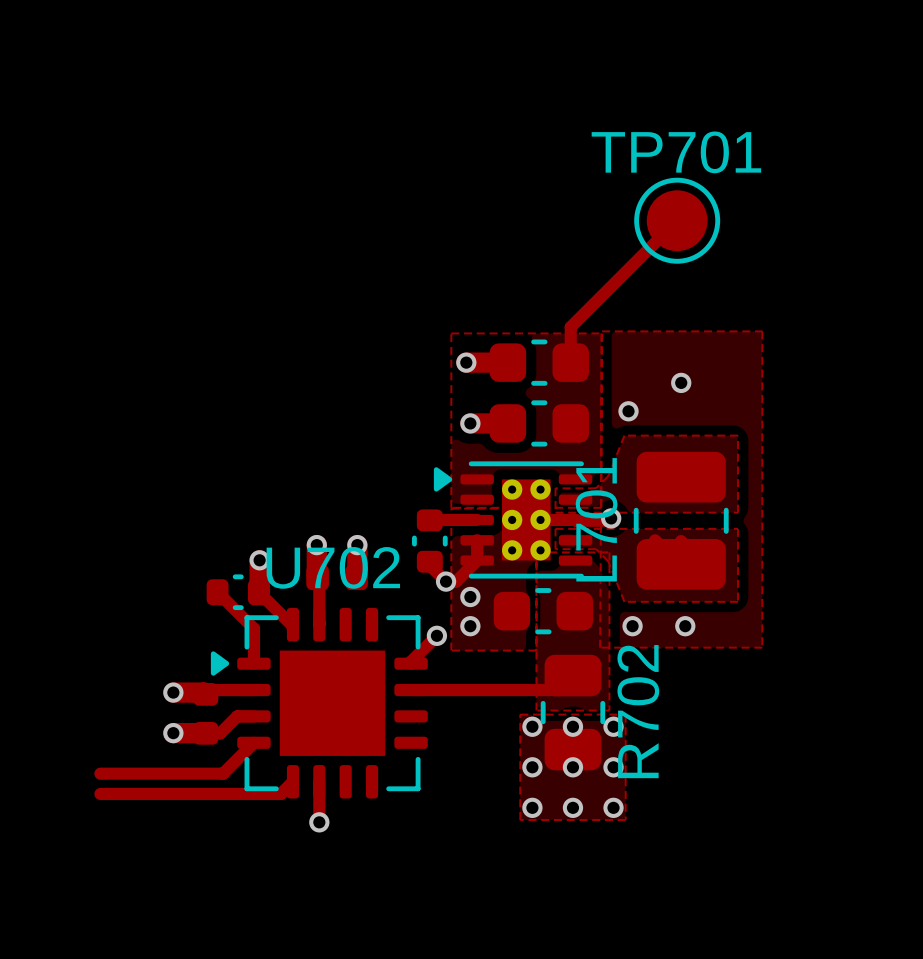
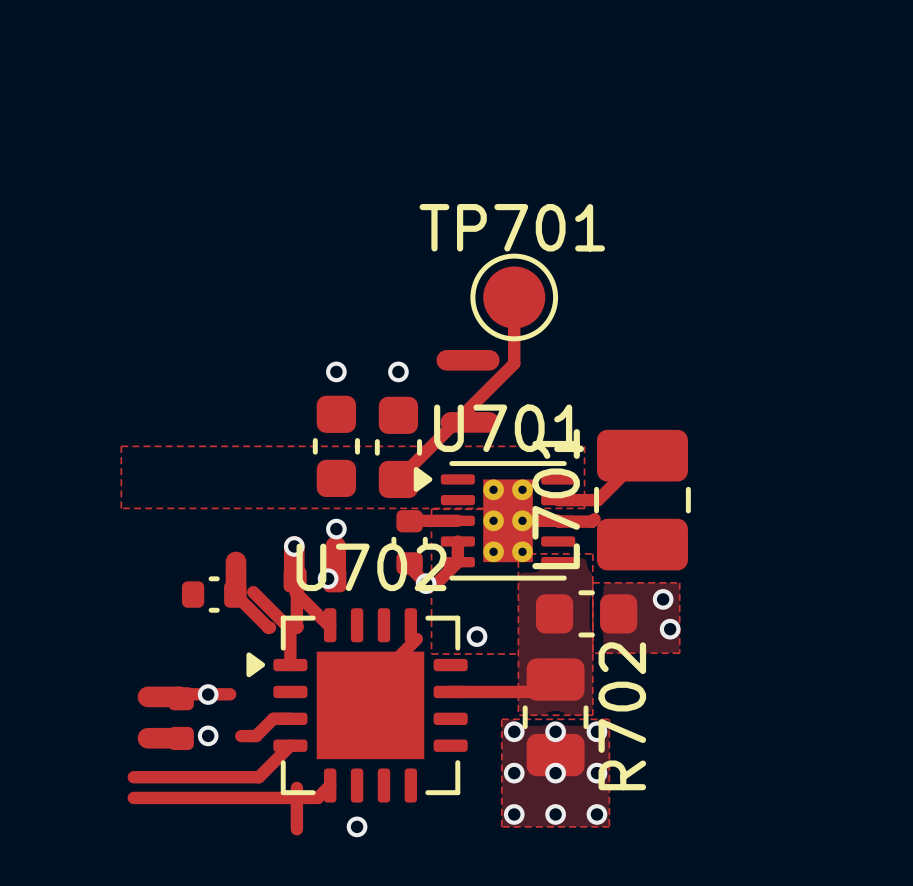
track: (677, 220) (570, 327) (570, 362) -> none
TP701 position: (677, 220) -> (514, 297)
track: none -> (514, 297) (514, 363) (398, 479)
zone outline: (602, 331) (600, 647) (762, 647) (762, 331) (602, 331) -> none
via: (466, 362) -> none
part: (539, 362) -> none
via: none -> (336, 371)
via: none -> (398, 371)
via: (681, 382) -> none
via: (628, 411) -> none
via: (470, 423) -> none
part: (539, 423) -> none
U701 name: none -> U701 (509, 428)
zone outline: (624, 435) (737, 435) (737, 512) (555, 512) (555, 488) (596, 488) (608, 476) (624, 435) -> none
part: none -> (336, 446)
zone outline: (601, 446) (601, 333) (451, 333) (451, 507) -> (584, 446) (121, 446) (121, 508) (431, 508)
part: none -> (398, 447)
track: none -> (642, 455) (598, 500) (558, 500)
via: (611, 518) -> none
L701 position: (681, 520) -> (642, 500)
zone outline: (555, 528) (737, 528) (737, 601) (624, 601) (608, 561) (596, 549) (555, 549) (555, 528) -> none
via position: (357, 545) -> (336, 529)
via: (259, 560) -> none
via: none -> (328, 578)
zone outline: none -> (592, 582) (679, 582) (679, 653) (592, 653)
track: none -> (295, 592) (330, 625)
track: (217, 592) (253, 628) (253, 663) -> (253, 592) (290, 629) (290, 665)
via: (470, 597) -> none
via: none -> (663, 599)
part position: (543, 611) -> (586, 613)
via: (470, 626) -> none
via: (632, 626) -> none
via: none -> (477, 636)
via: (436, 635) -> none
track: (560, 687) (558, 690) (411, 690) -> (543, 691) (450, 691)
via: none -> (208, 694)
via: (173, 692) -> none
U702 position: (319, 703) -> (357, 705)
track: (253, 716) (237, 716) (220, 733) (205, 733) -> (290, 718) (273, 718) (256, 736) (241, 736)
via: none -> (208, 735)
via: (173, 733) -> none
track: (253, 742) (223, 773) (100, 773) -> (290, 745) (258, 777) (133, 777)
track: (292, 781) (280, 793) (100, 793) -> (330, 785) (317, 797) (133, 797)
via position: (319, 822) -> (357, 826)

